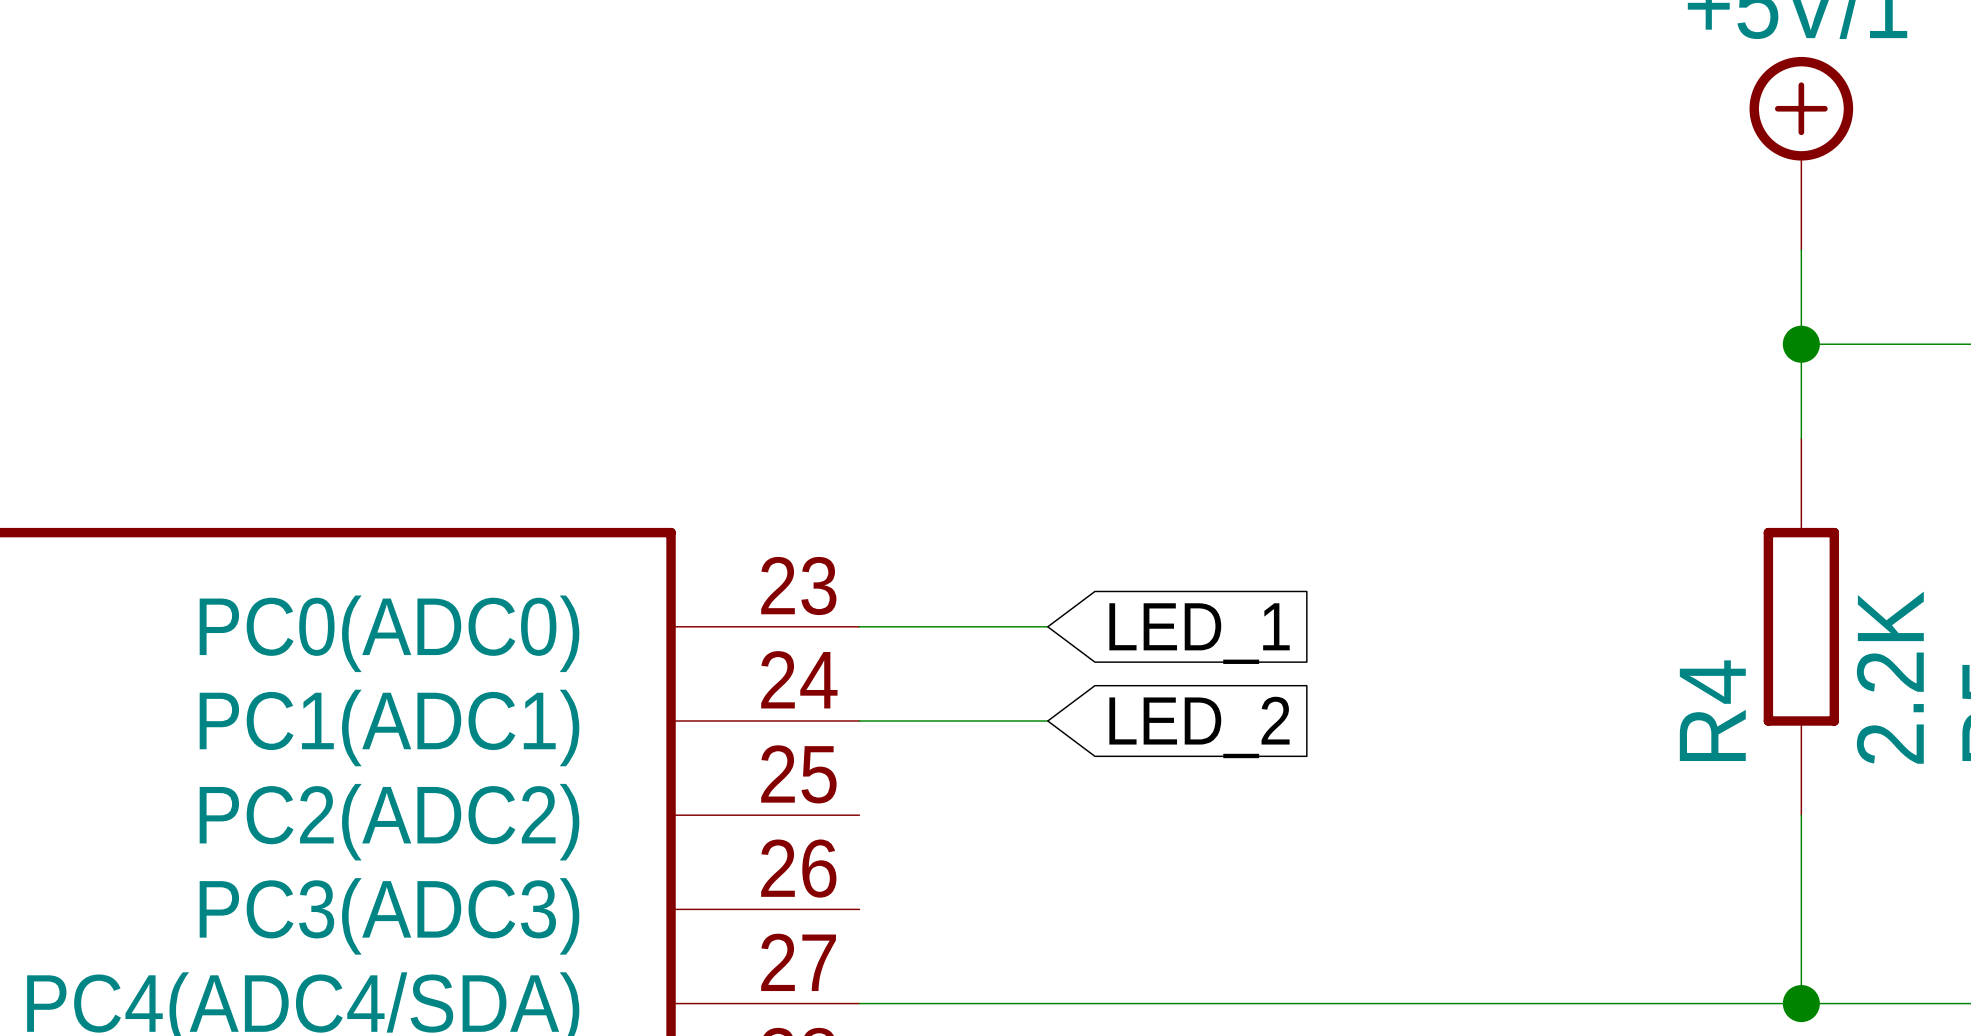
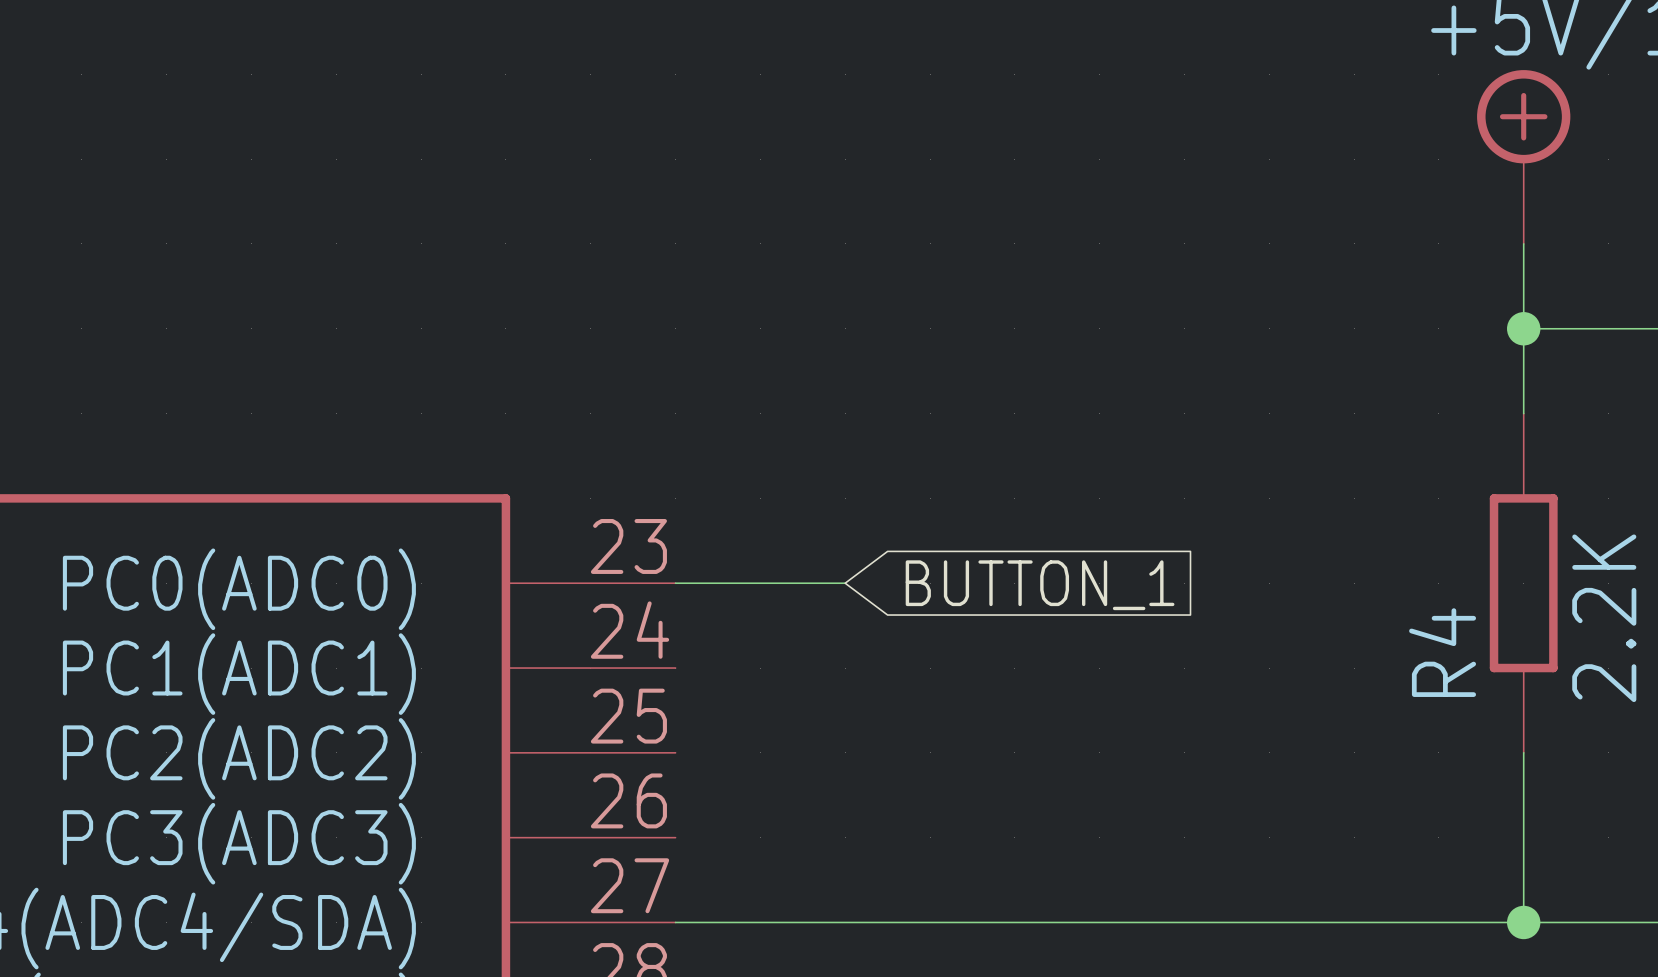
global label: LED_1 (1199, 633) -> BUTTON_1 (1040, 585)
wire: (859, 721) (1047, 721) -> none
global label: LED_2 (1199, 727) -> none

